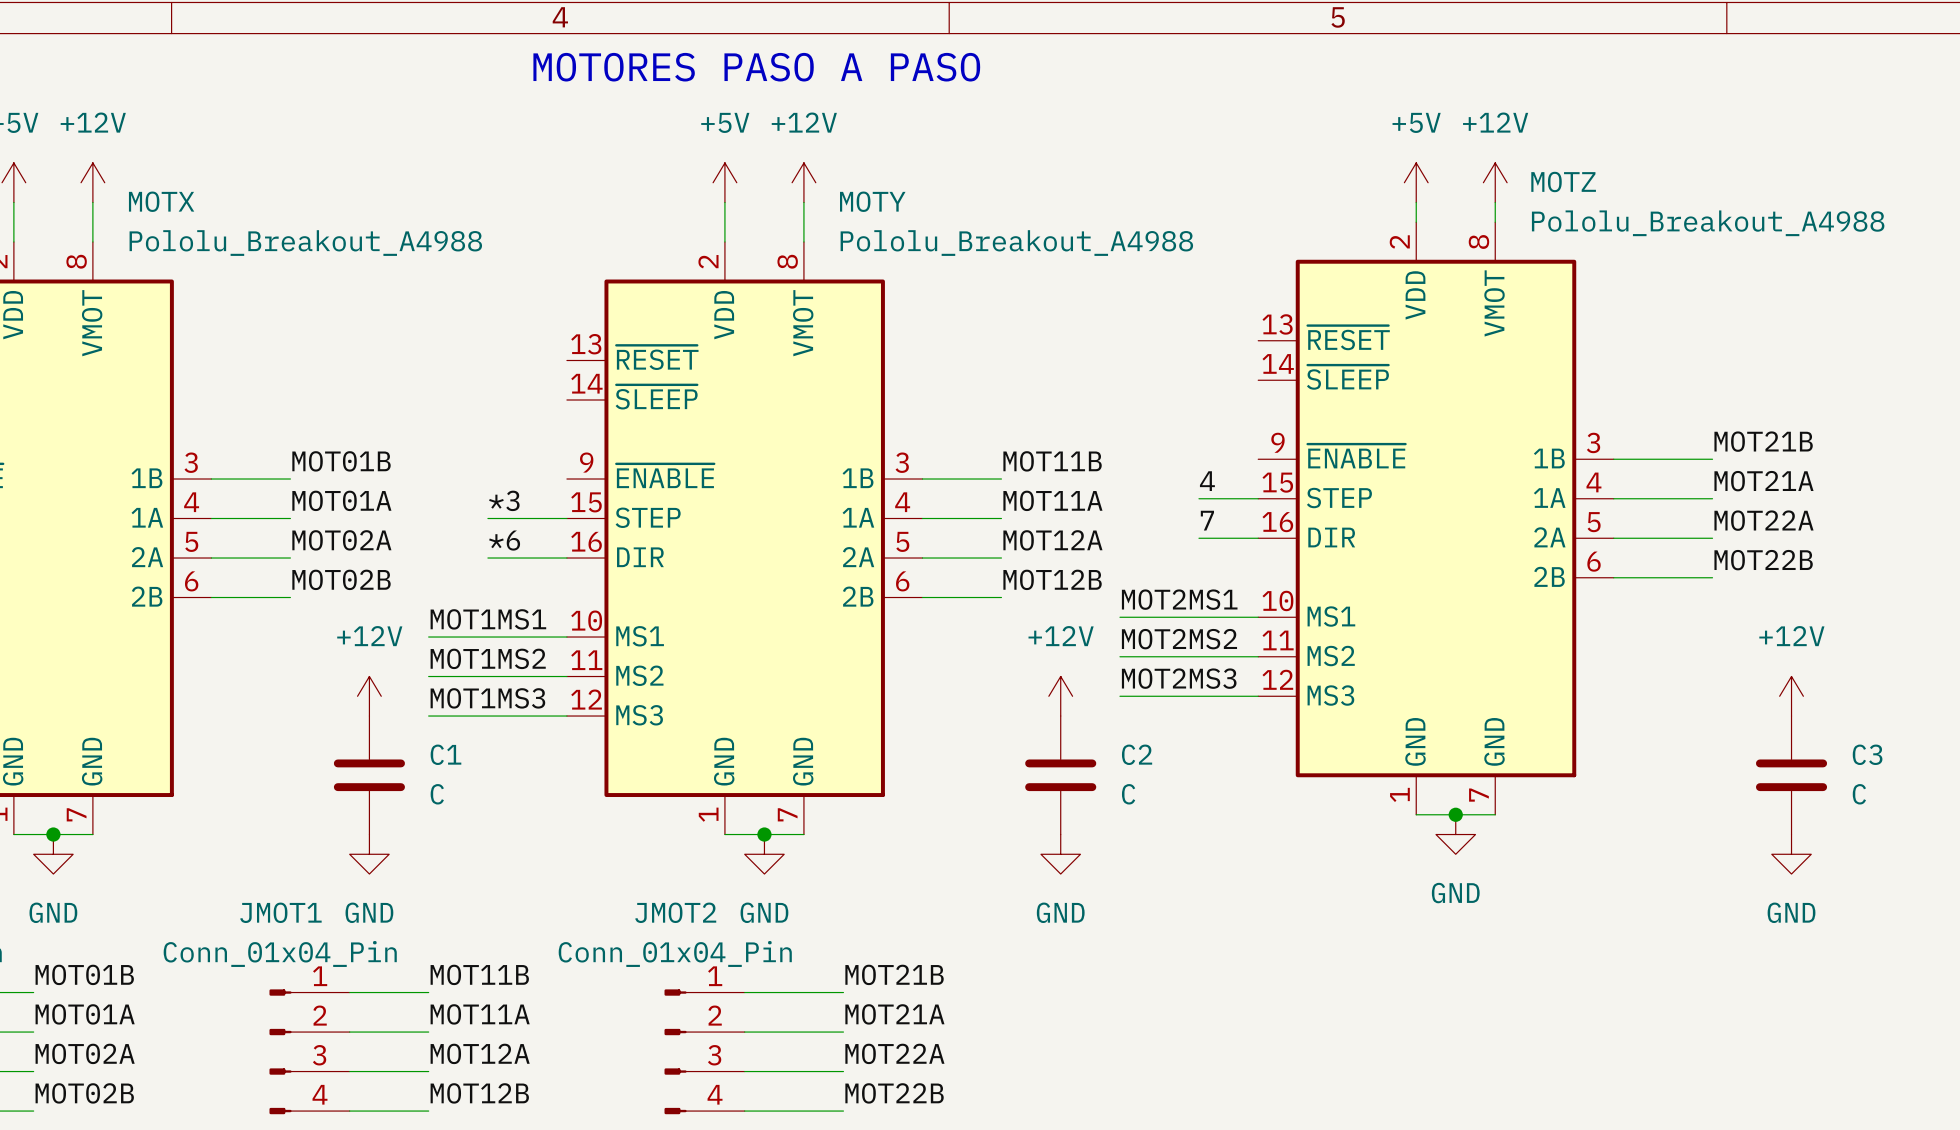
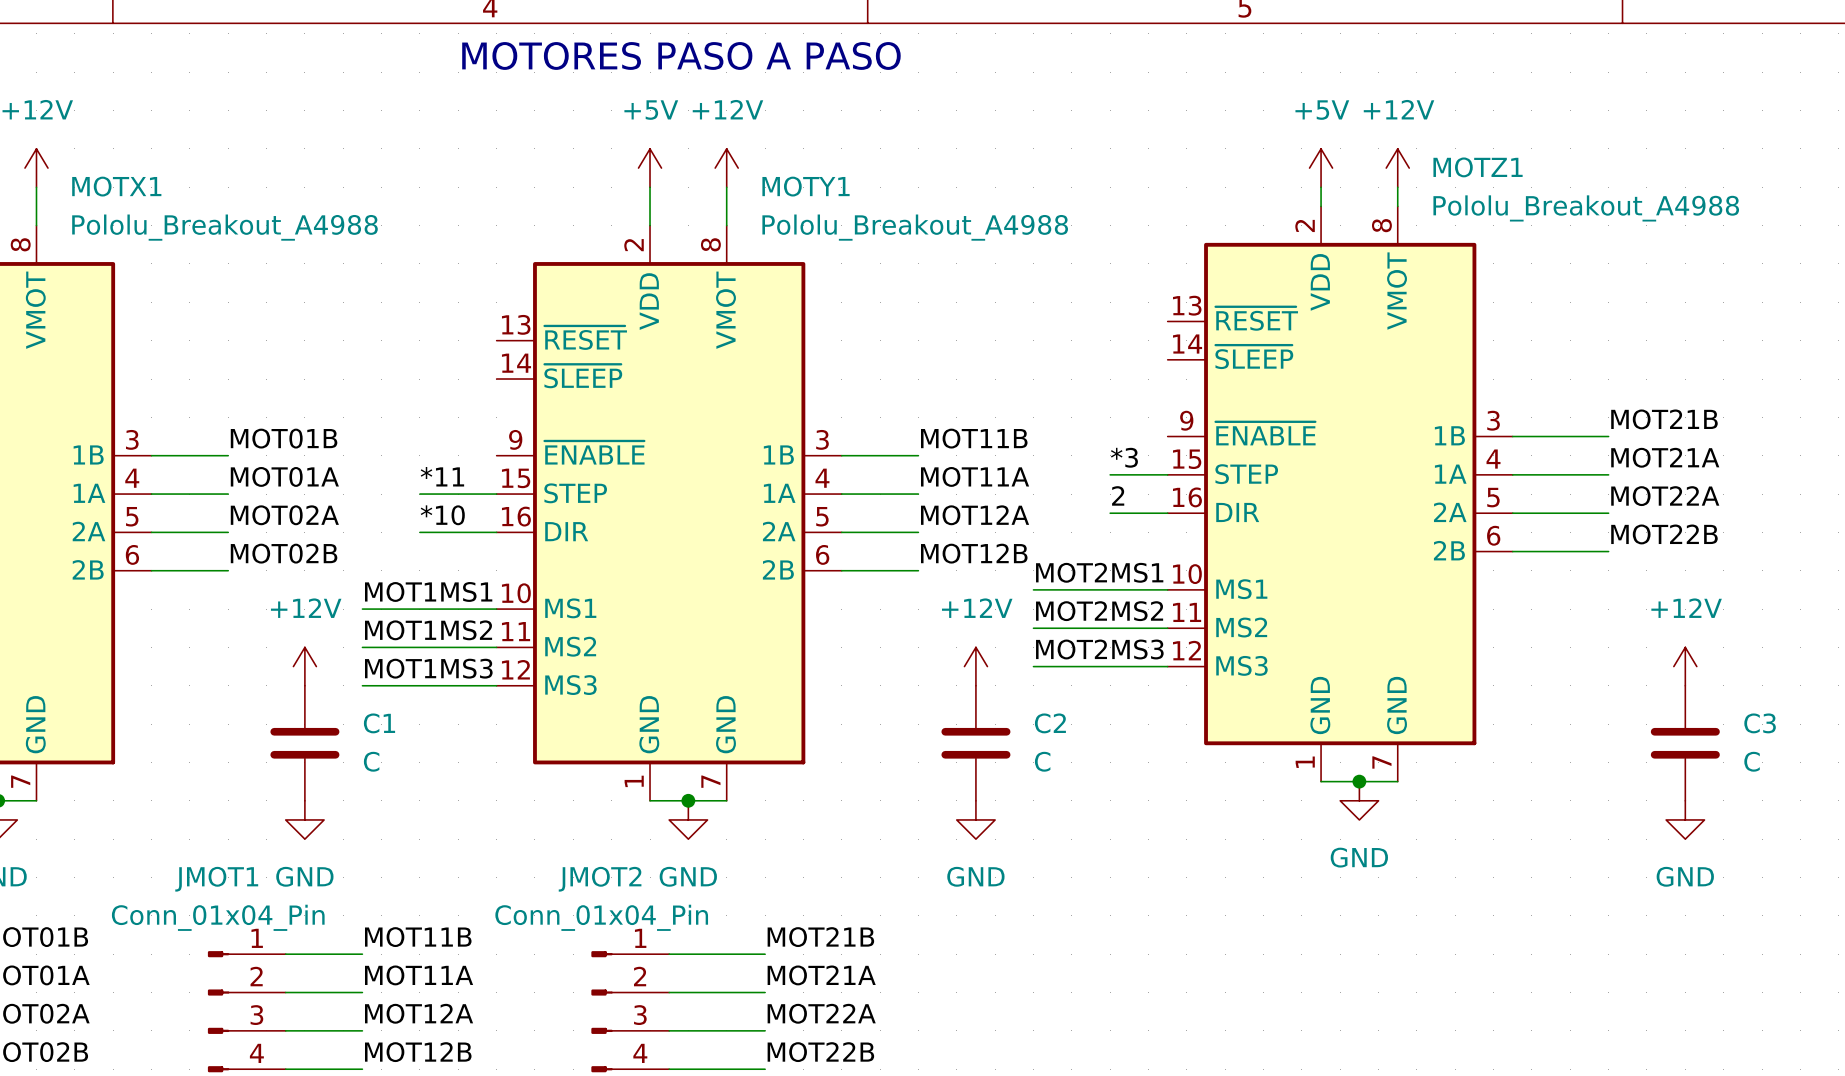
MOTZ name: MOTZ (1563, 181) -> MOTZ1 (1478, 167)
MOTX name: MOTX (161, 201) -> MOTX1 (116, 186)
MOTY name: MOTY (872, 201) -> MOTY1 (806, 186)
label: 4 (1207, 481) -> *3 (1124, 457)
label: *3 (504, 500) -> *11 (442, 476)
label: 7 (1207, 520) -> 2 (1118, 495)
label: *6 (504, 540) -> *10 (442, 515)

